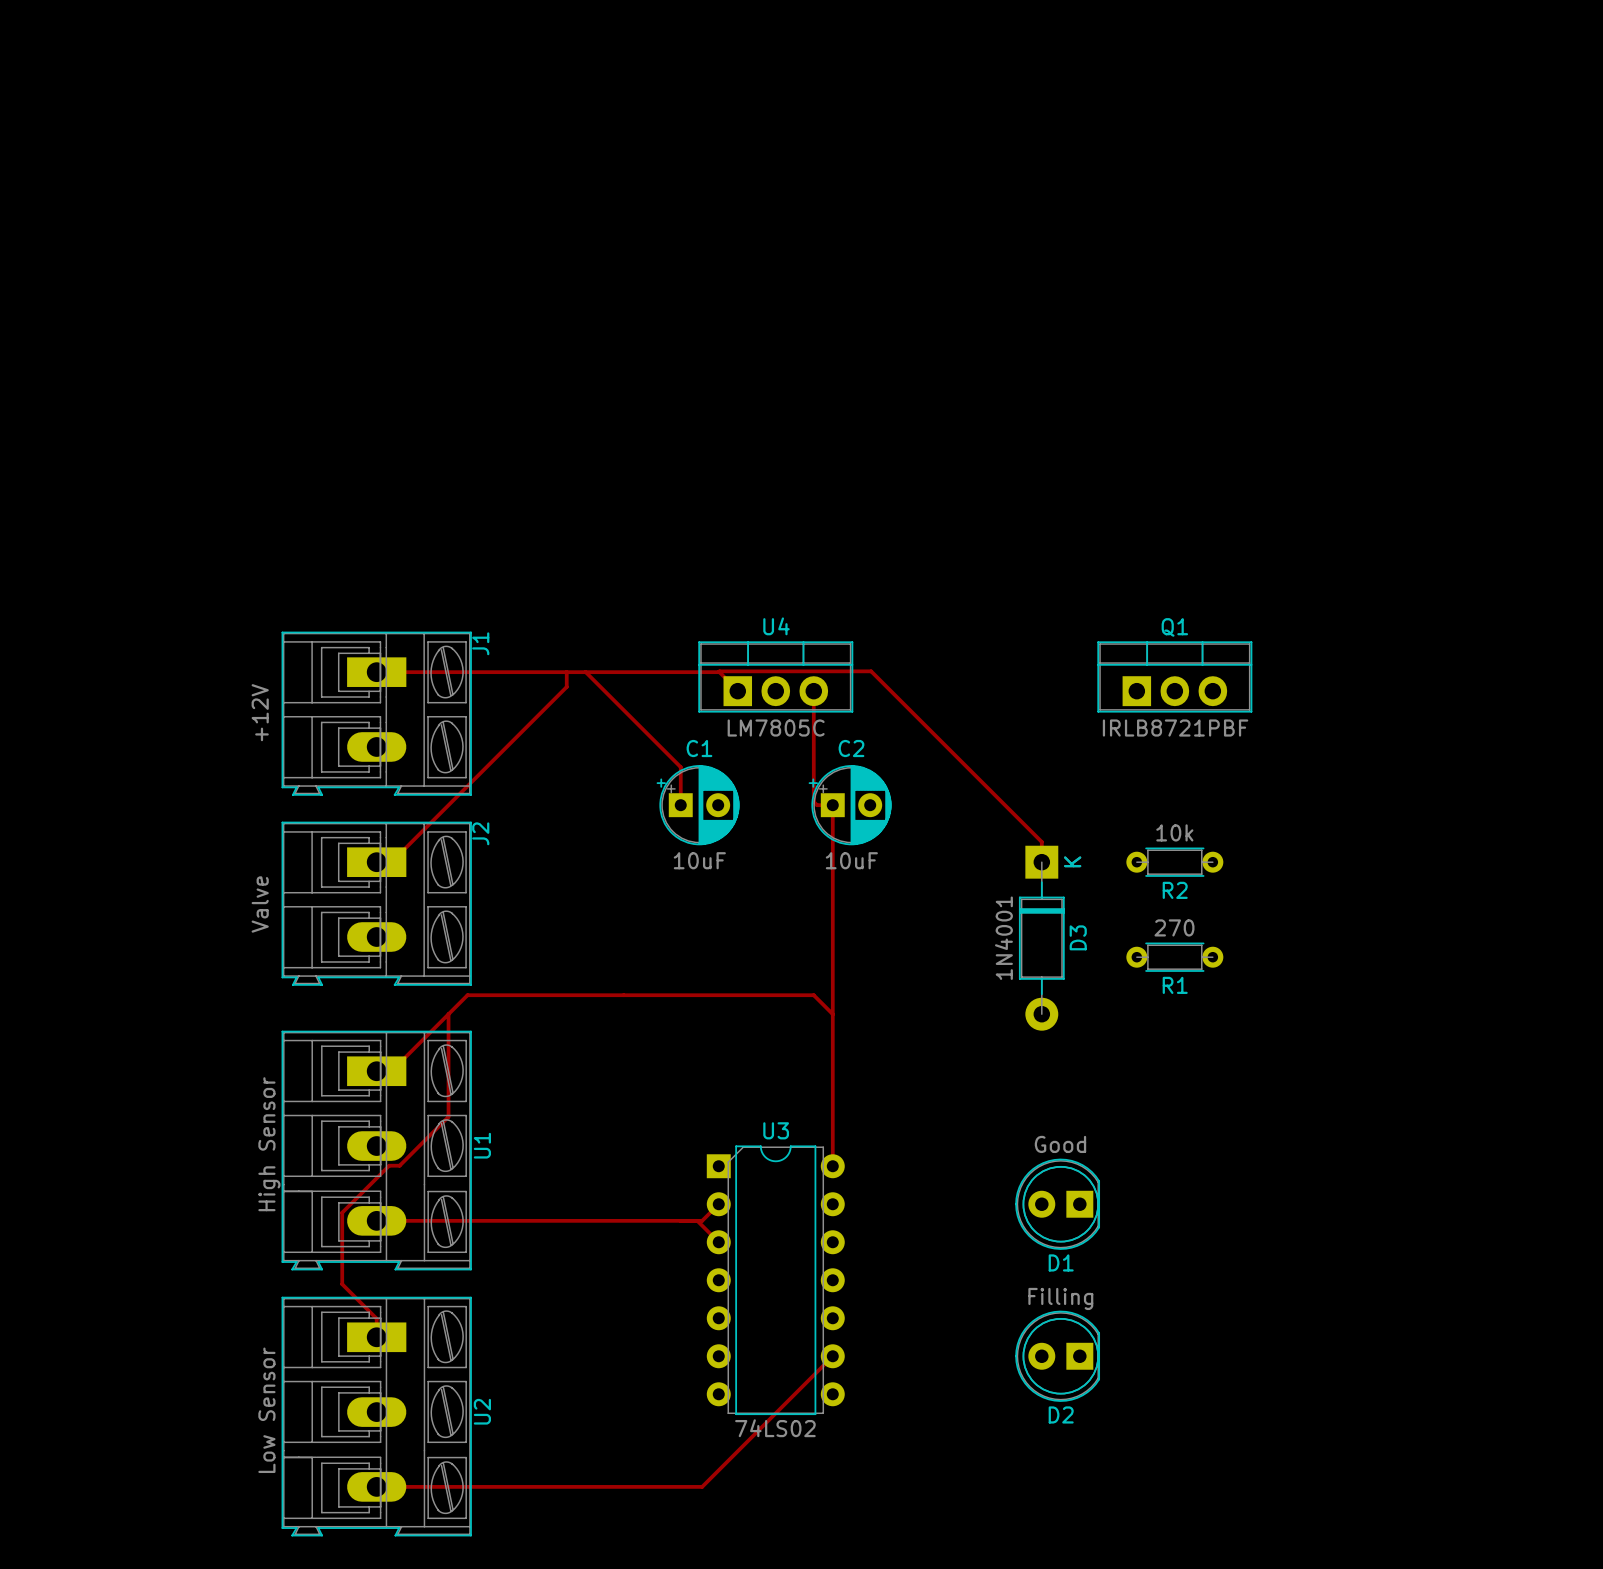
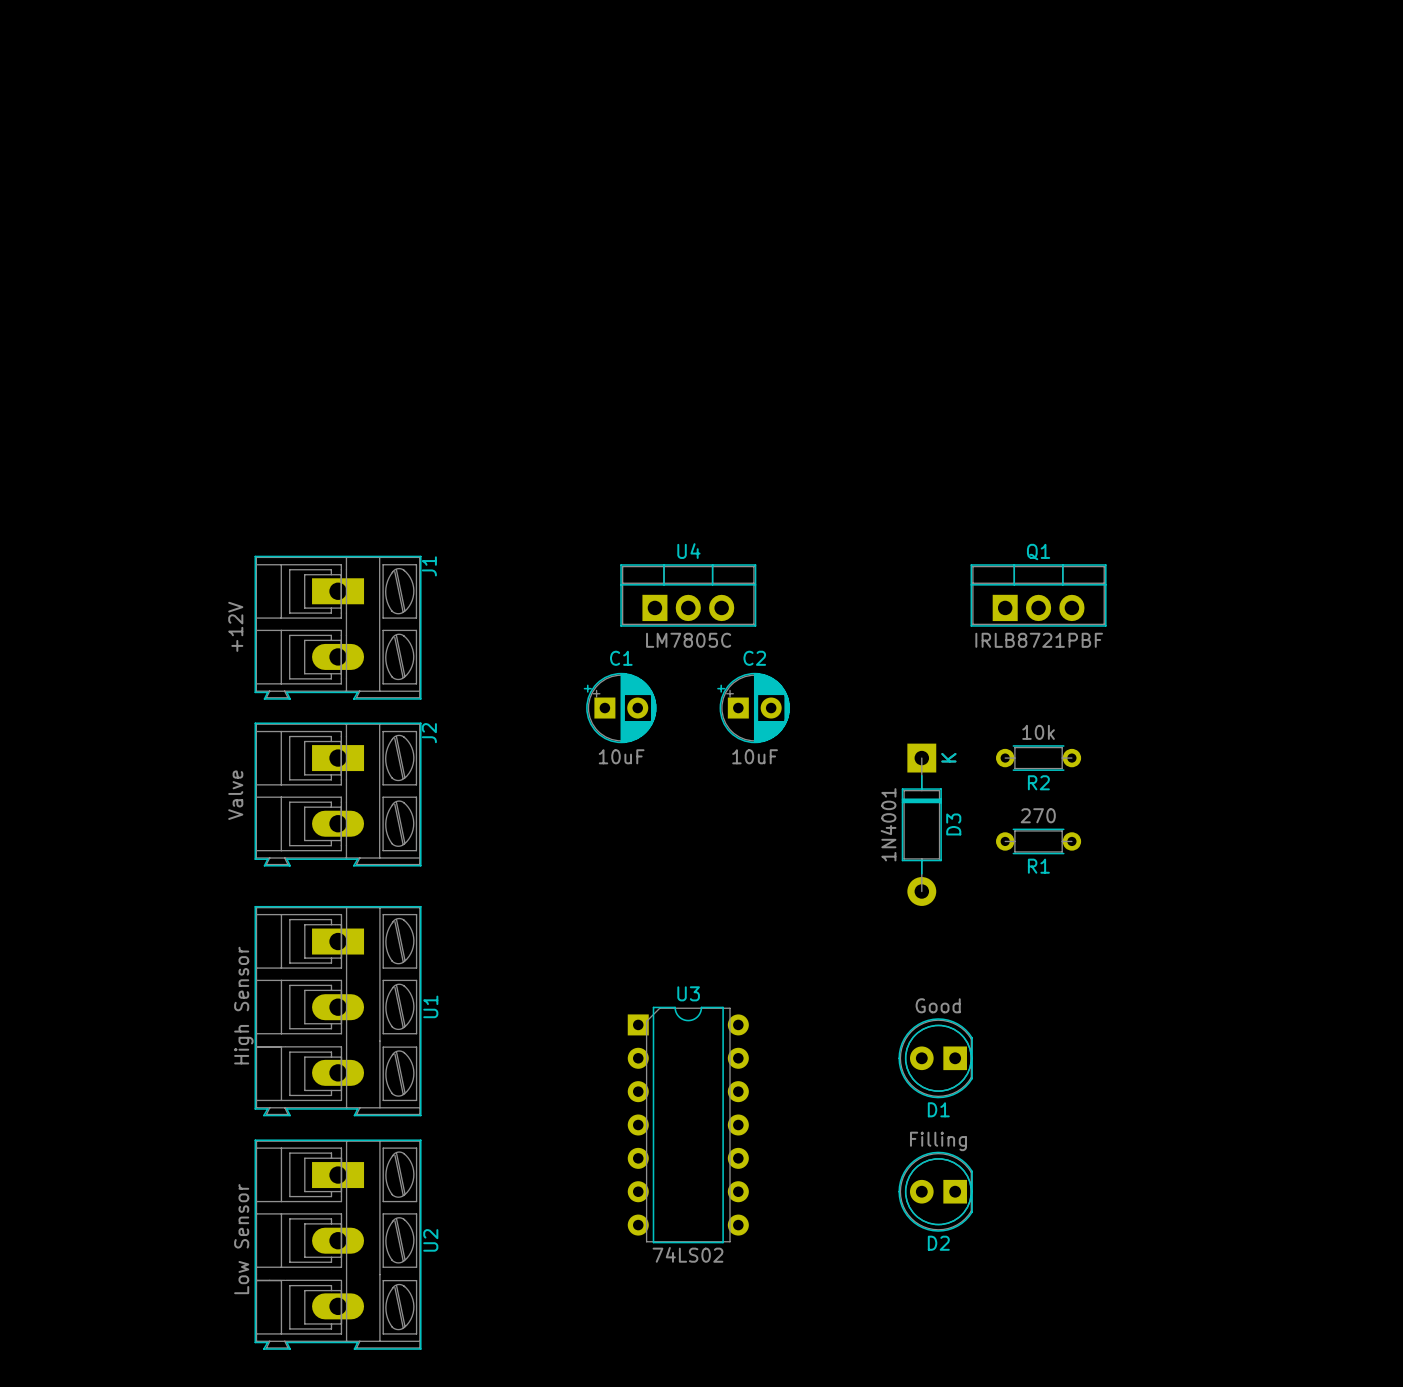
top track: (376, 672) (719, 672) (737, 691) -> none
top track: (566, 672) (566, 686) (391, 862) (376, 862) -> none
top track: (585, 672) (680, 767) (680, 805) -> none
top track: (718, 672) (871, 671) (1041, 841) (1041, 862) -> none
top track: (813, 691) (813, 801) (817, 805) (832, 805) (832, 1166) -> none
top track: (448, 1014) (448, 1116) (399, 1165) (389, 1165) (342, 1212) (342, 1284) (376, 1318) (376, 1337) -> none
top track: (832, 1014) (813, 995) (467, 995) (391, 1071) (376, 1071) -> none
top track: (718, 1204) (702, 1220) (376, 1220) -> none
top track: (697, 1220) (718, 1242) -> none
top track: (832, 1356) (702, 1486) (376, 1486) -> none

